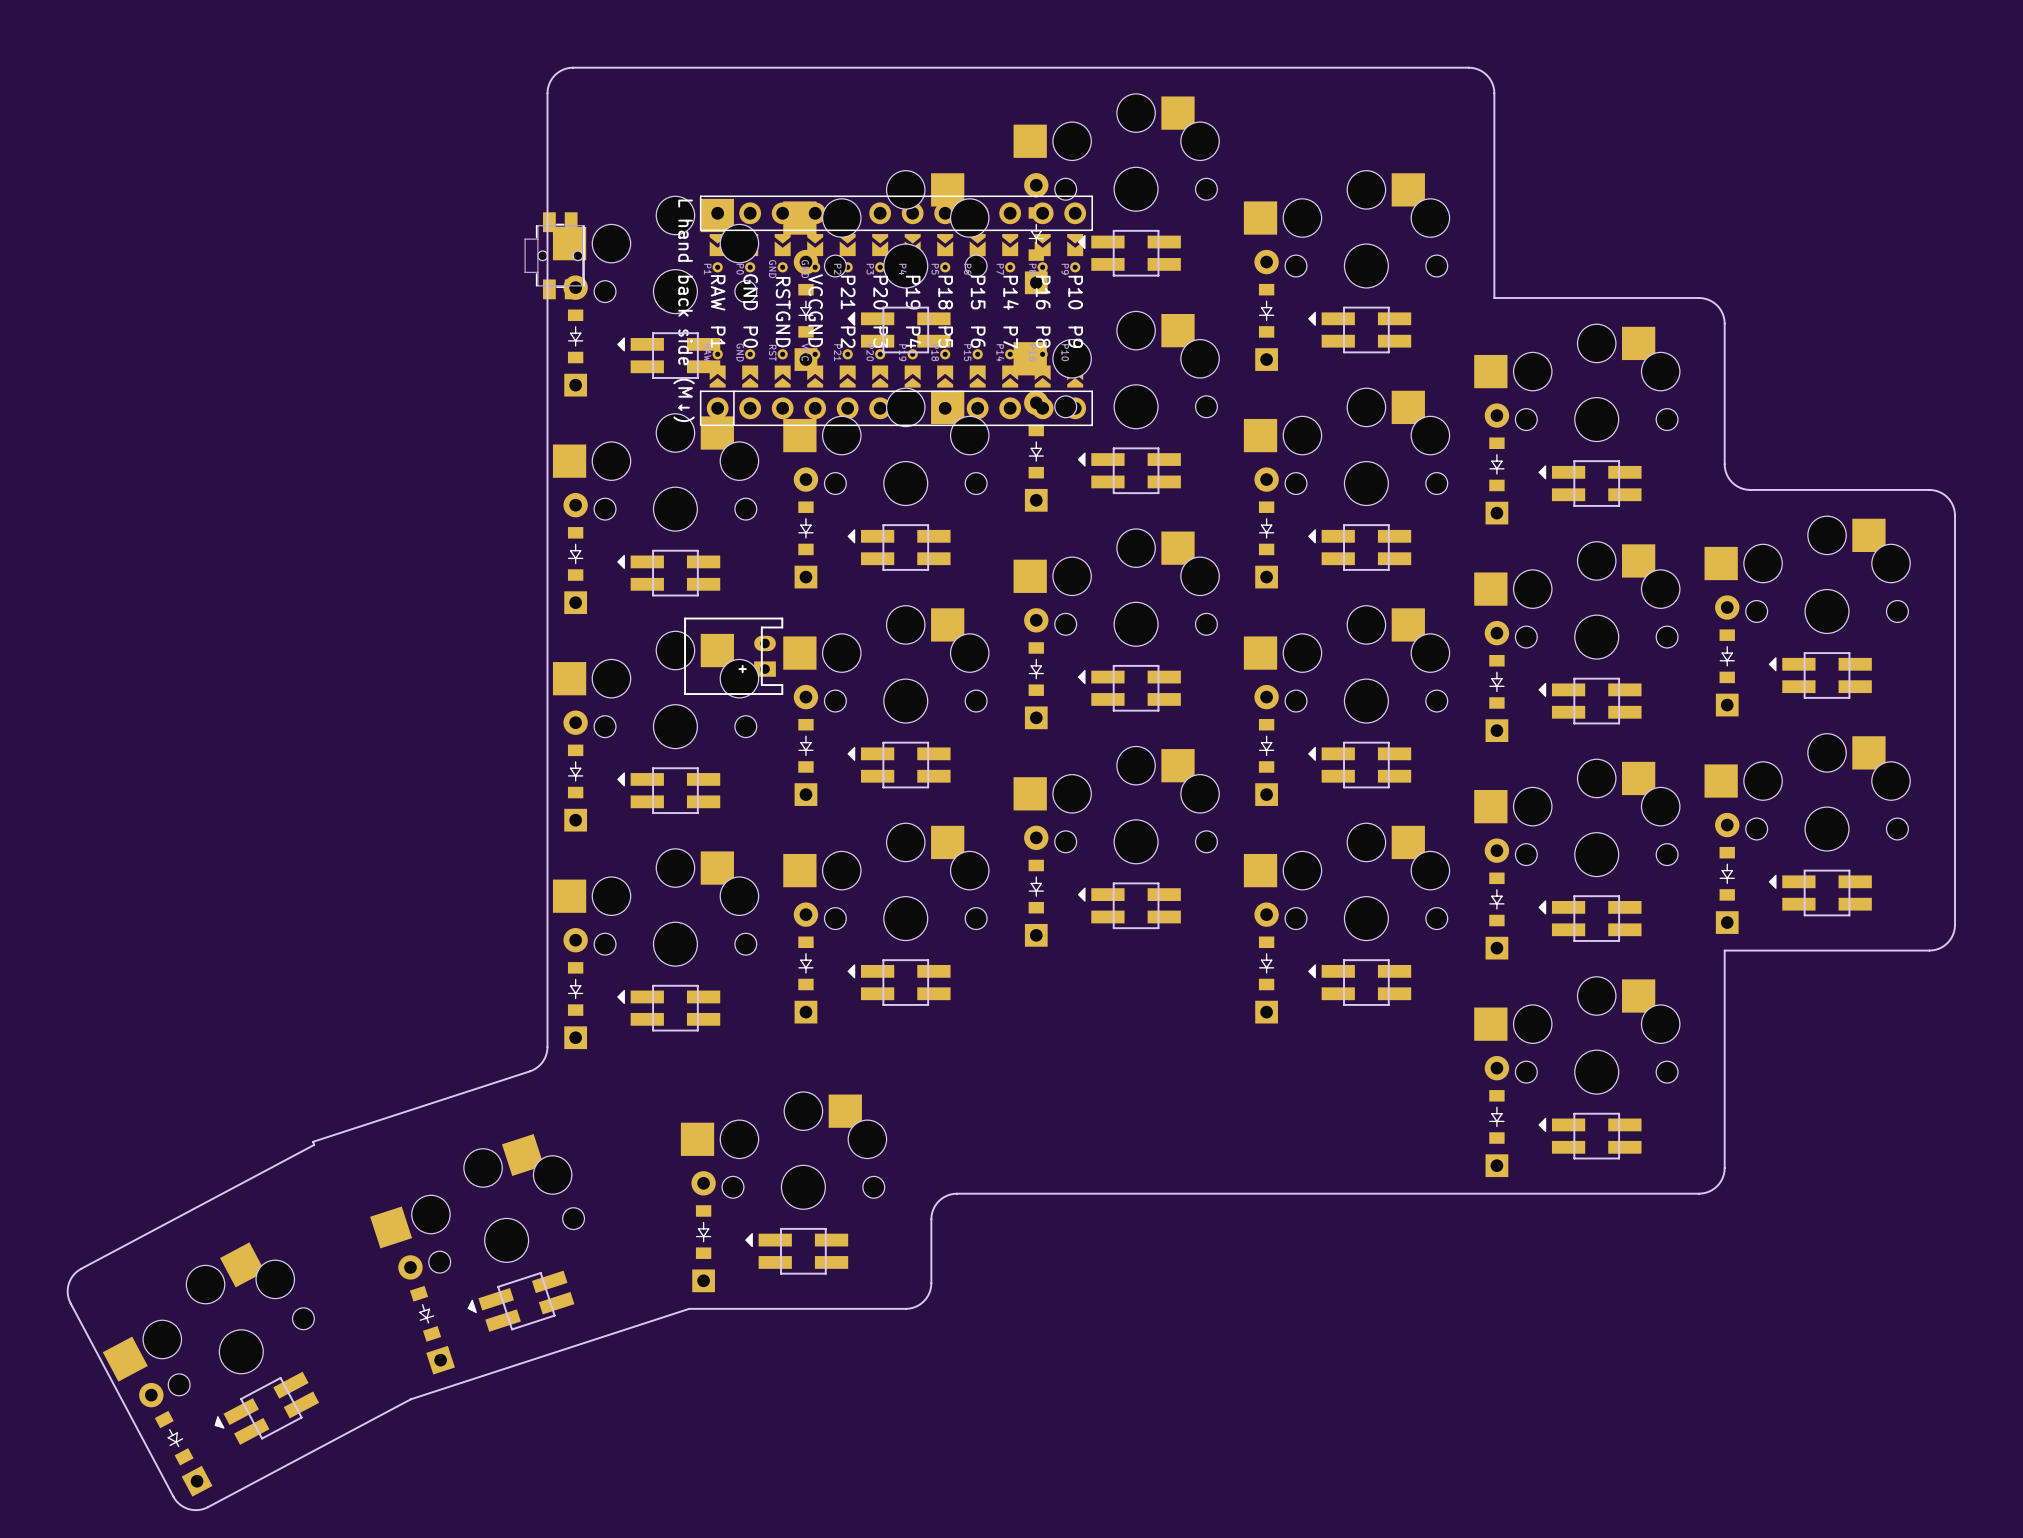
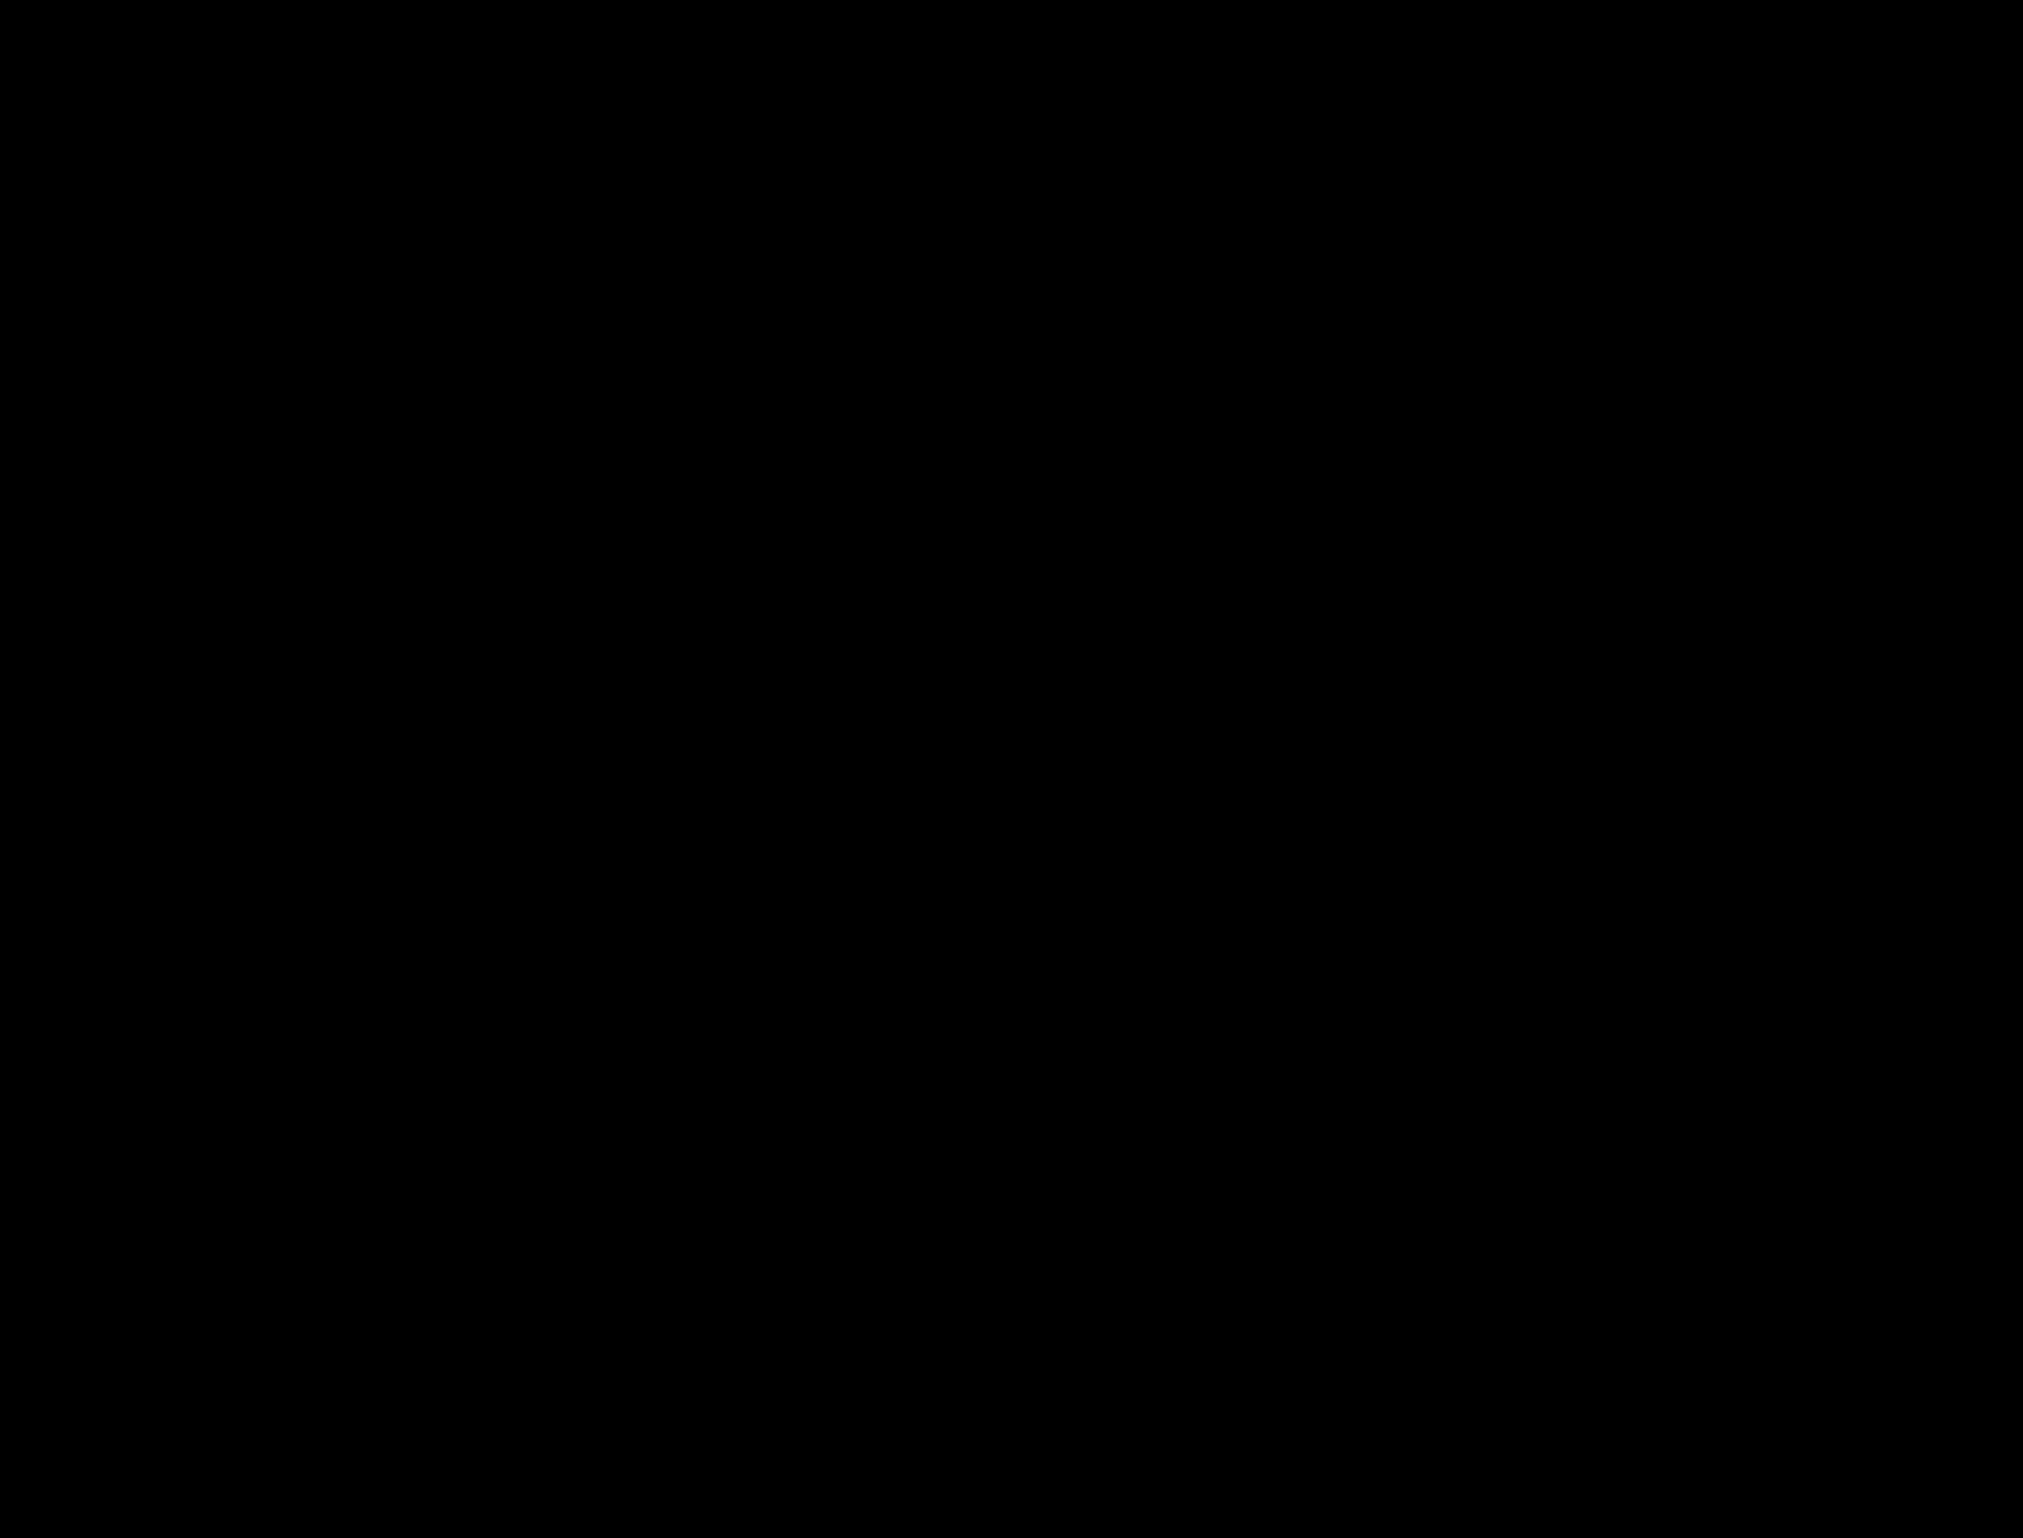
board edge: (1468, 67) (573, 67) (563, 69) (554, 75) (549, 83) (547, 93) (546, 1053) (540, 1064) (529, 1071) (313, 1141) (314, 1144) (81, 1268) (72, 1276) (67, 1289) (70, 1303) (178, 1503) (191, 1509) (205, 1508) (410, 1399) (689, 1308) (905, 1308) (915, 1306) (926, 1298) (931, 1286) (932, 1212) (938, 1201) (950, 1194) (1705, 1192) (1717, 1186) (1724, 1171) (1724, 950) (1929, 950) (1939, 948) (1947, 943) (1953, 934) (1955, 924) (1955, 515) (1951, 502) (1942, 493) (1932, 490) (1750, 489) (1734, 484) (1728, 477) (1724, 464) (1724, 320) (1719, 308) (1708, 299) (1699, 298) (1494, 298) (1494, 89) (1490, 80) (1484, 72) (1468, 67) -> none
part: (1116, 152) -> none
part: (886, 229) -> none
part: (1346, 229) -> none
part: (1036, 233) -> none
part: (1129, 253) -> none
part: (655, 254) -> none
part: (554, 255) -> none
part: (805, 310) -> none
part: (896, 310) -> none
part: (1266, 310) -> none
part: (899, 329) -> none
part: (1359, 329) -> none
part: (575, 335) -> none
part: (668, 355) -> none
part: (1116, 370) -> none
part: (1577, 382) -> none
part: (886, 446) -> none
part: (1346, 446) -> none
part: (1036, 451) -> none
part: (1496, 463) -> none
part: (1129, 470) -> none
part: (655, 472) -> none
part: (1590, 483) -> none
part: (805, 527) -> none
part: (1266, 527) -> none
part: (899, 547) -> none
part: (1359, 547) -> none
part: (575, 553) -> none
part: (668, 573) -> none
part: (1807, 574) -> none
part: (1116, 587) -> none
part: (1577, 600) -> none
part: (1727, 655) -> none
part: (733, 656) -> none
part: (886, 664) -> none
part: (1346, 664) -> none
part: (1036, 668) -> none
part: (1820, 675) -> none
part: (1496, 681) -> none
part: (1129, 688) -> none
part: (655, 689) -> none
part: (1590, 701) -> none
part: (805, 745) -> none
part: (1266, 745) -> none
part: (899, 765) -> none
part: (1359, 765) -> none
part: (575, 771) -> none
part: (668, 790) -> none
part: (1807, 792) -> none
part: (1116, 805) -> none
part: (1577, 817) -> none
part: (1727, 873) -> none
part: (886, 881) -> none
part: (1346, 881) -> none
part: (1036, 886) -> none
part: (1820, 893) -> none
part: (1496, 898) -> none
part: (1129, 905) -> none
part: (655, 907) -> none
part: (1590, 918) -> none
part: (805, 962) -> none
part: (1266, 962) -> none
part: (899, 982) -> none
part: (1359, 982) -> none
part: (575, 988) -> none
part: (668, 1008) -> none
part: (1577, 1035) -> none
part: (1496, 1116) -> none
part: (1590, 1136) -> none
part: (783, 1150) -> none
part: (477, 1203) -> none
part: (703, 1231) -> none
part: (796, 1251) -> none
part: (520, 1301) -> none
part: (426, 1314) -> none
part: (208, 1319) -> none
part: (266, 1408) -> none
part: (175, 1439) -> none

